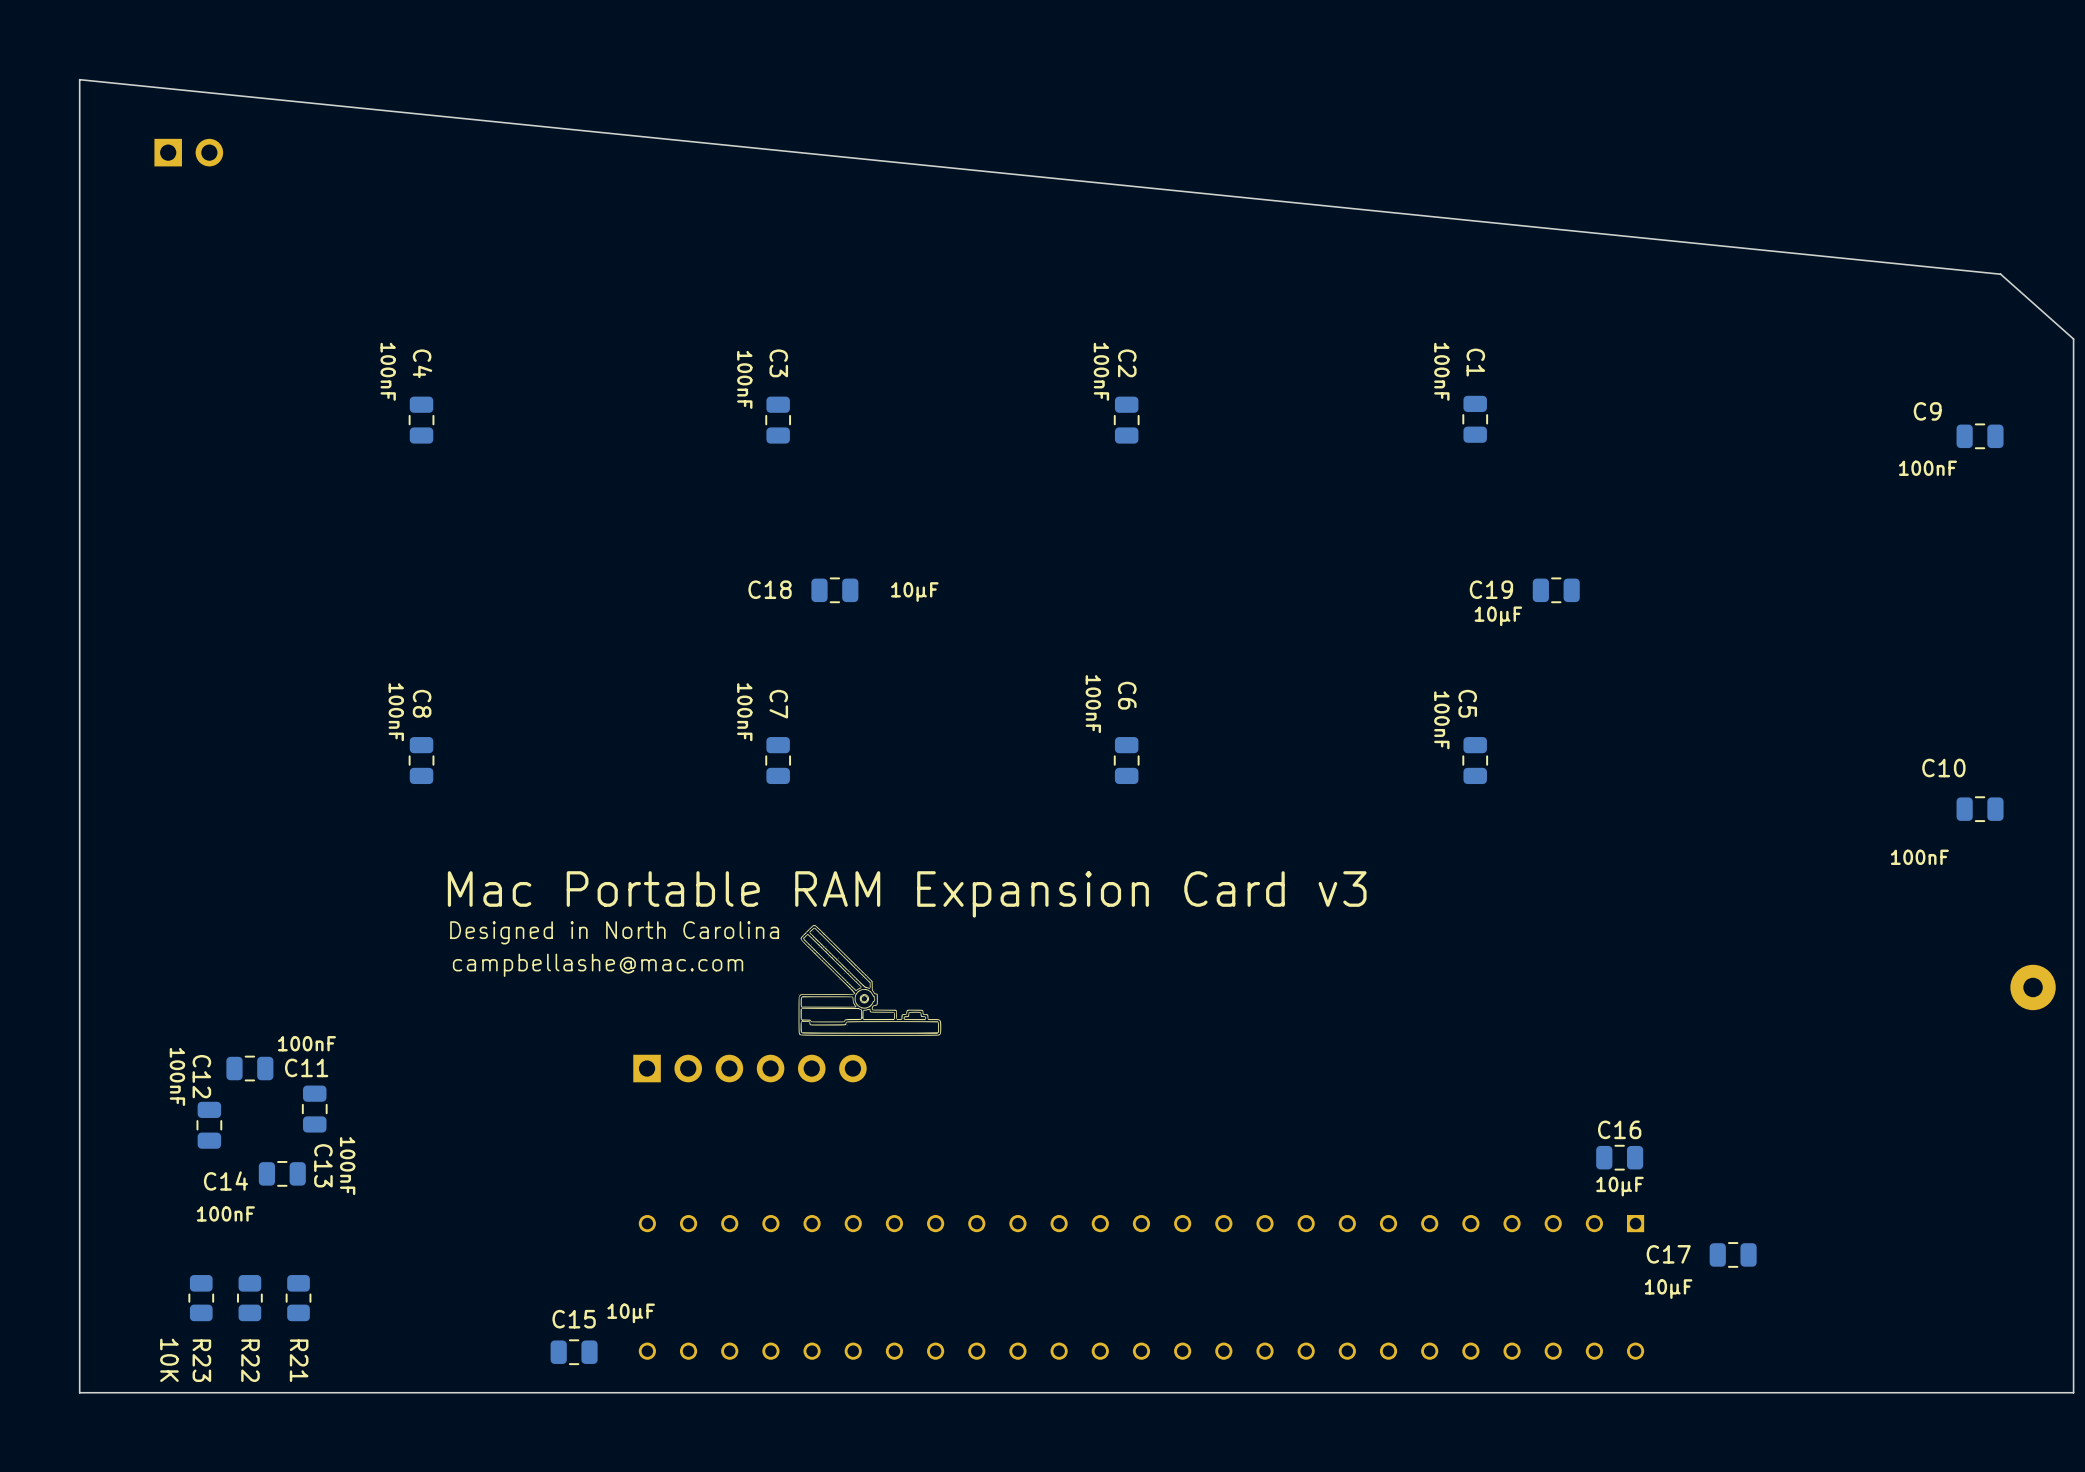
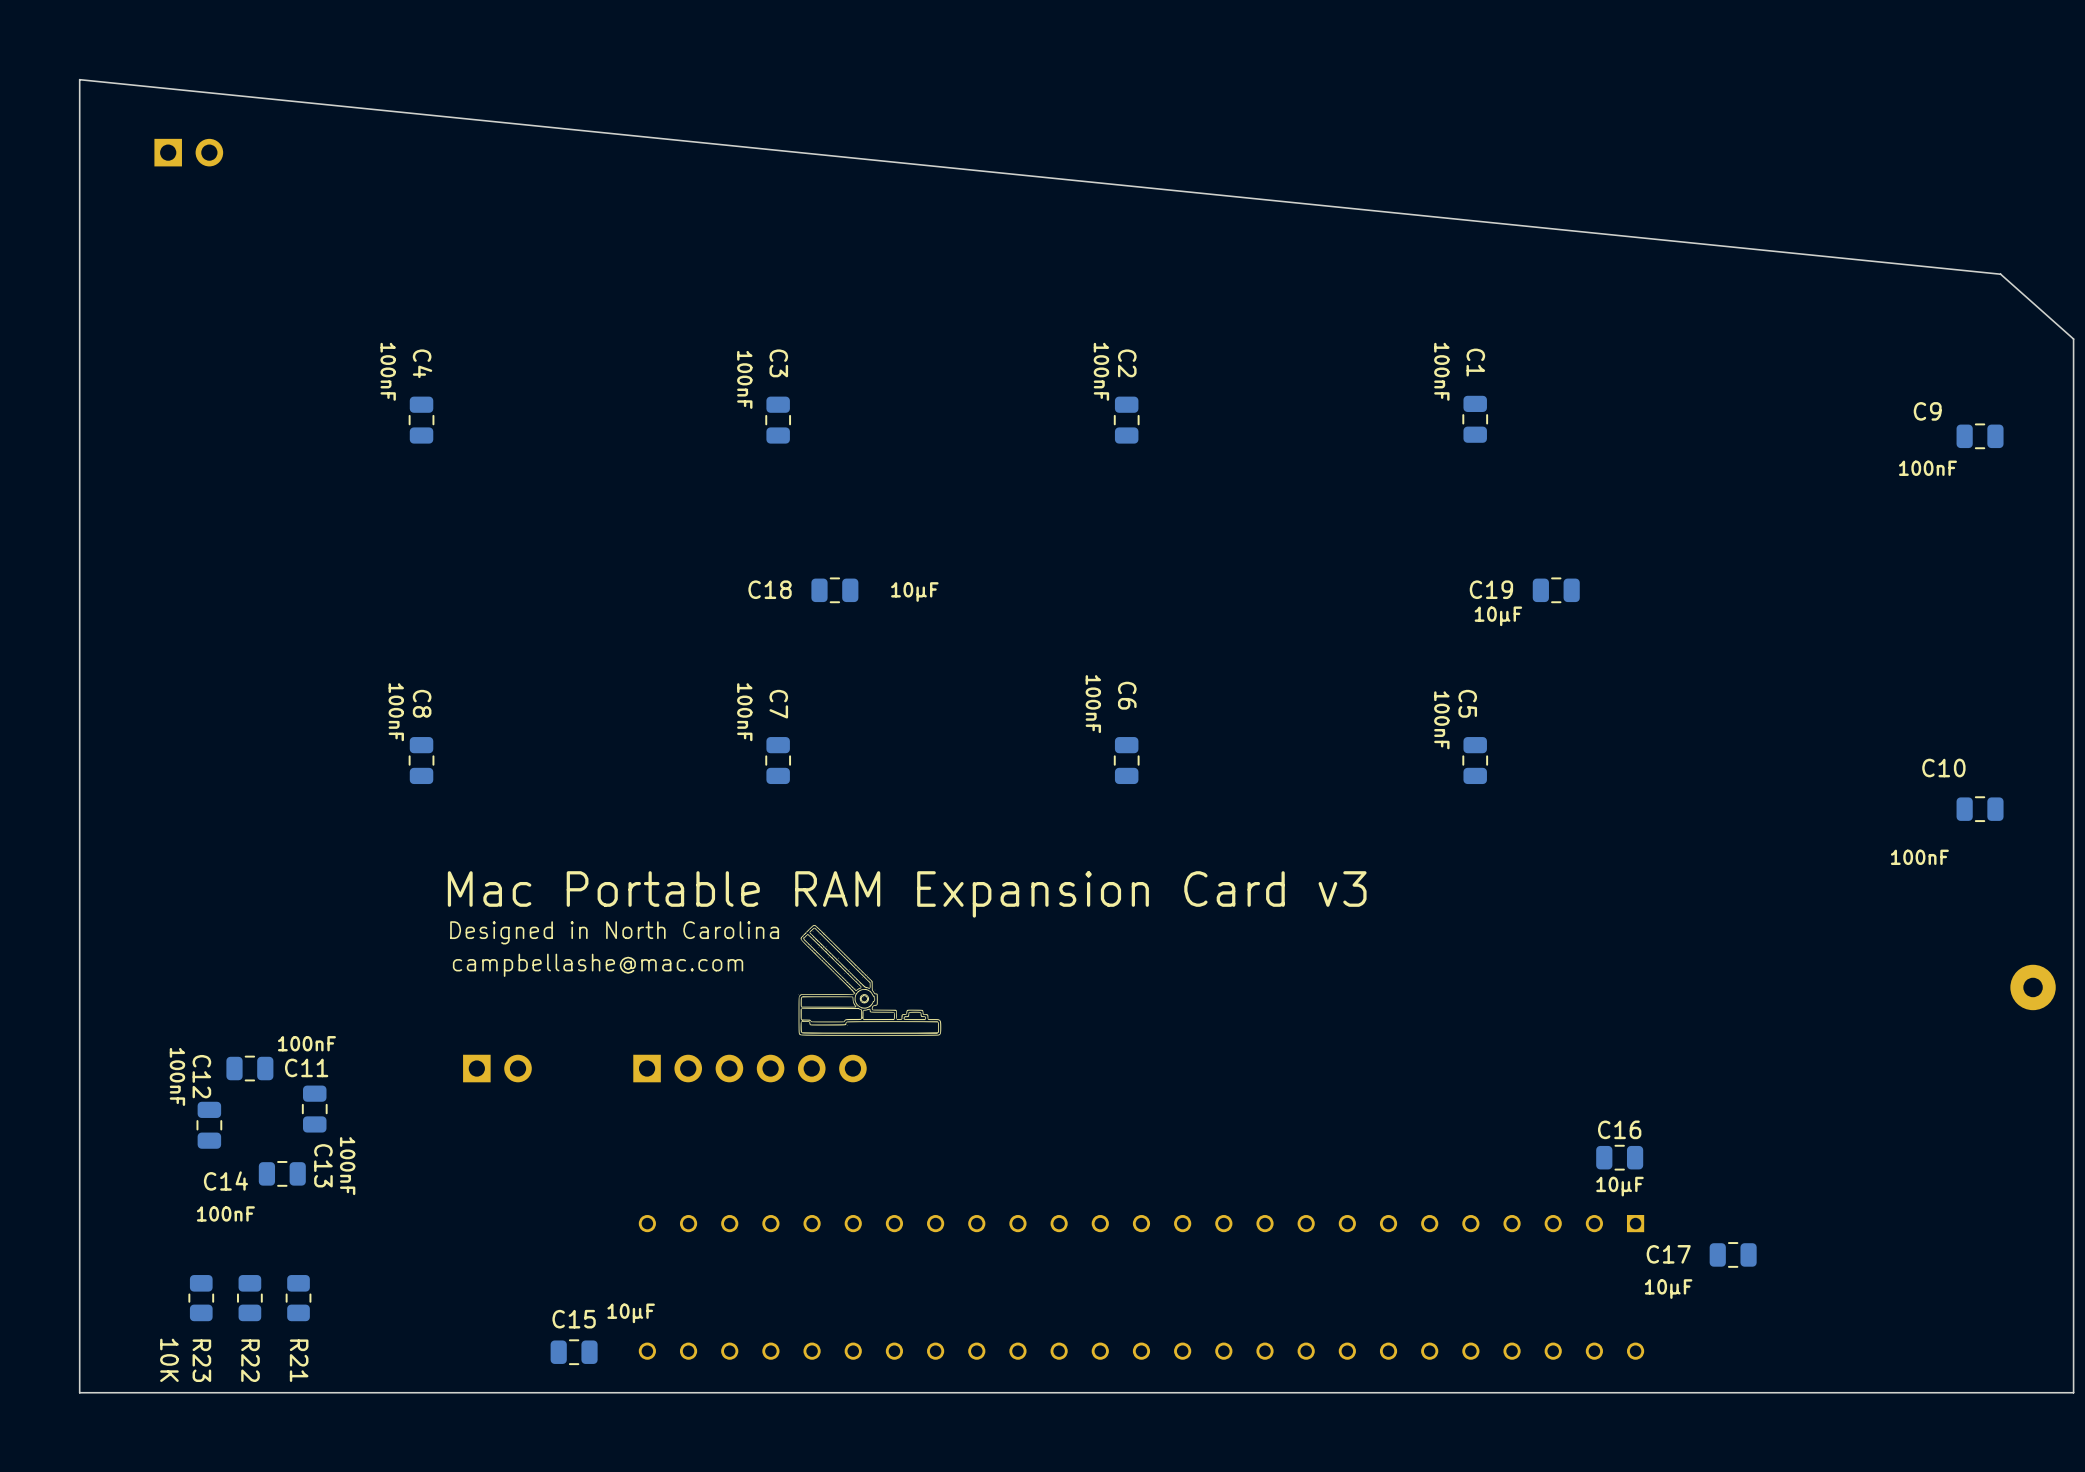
part: none -> (497, 1068)

